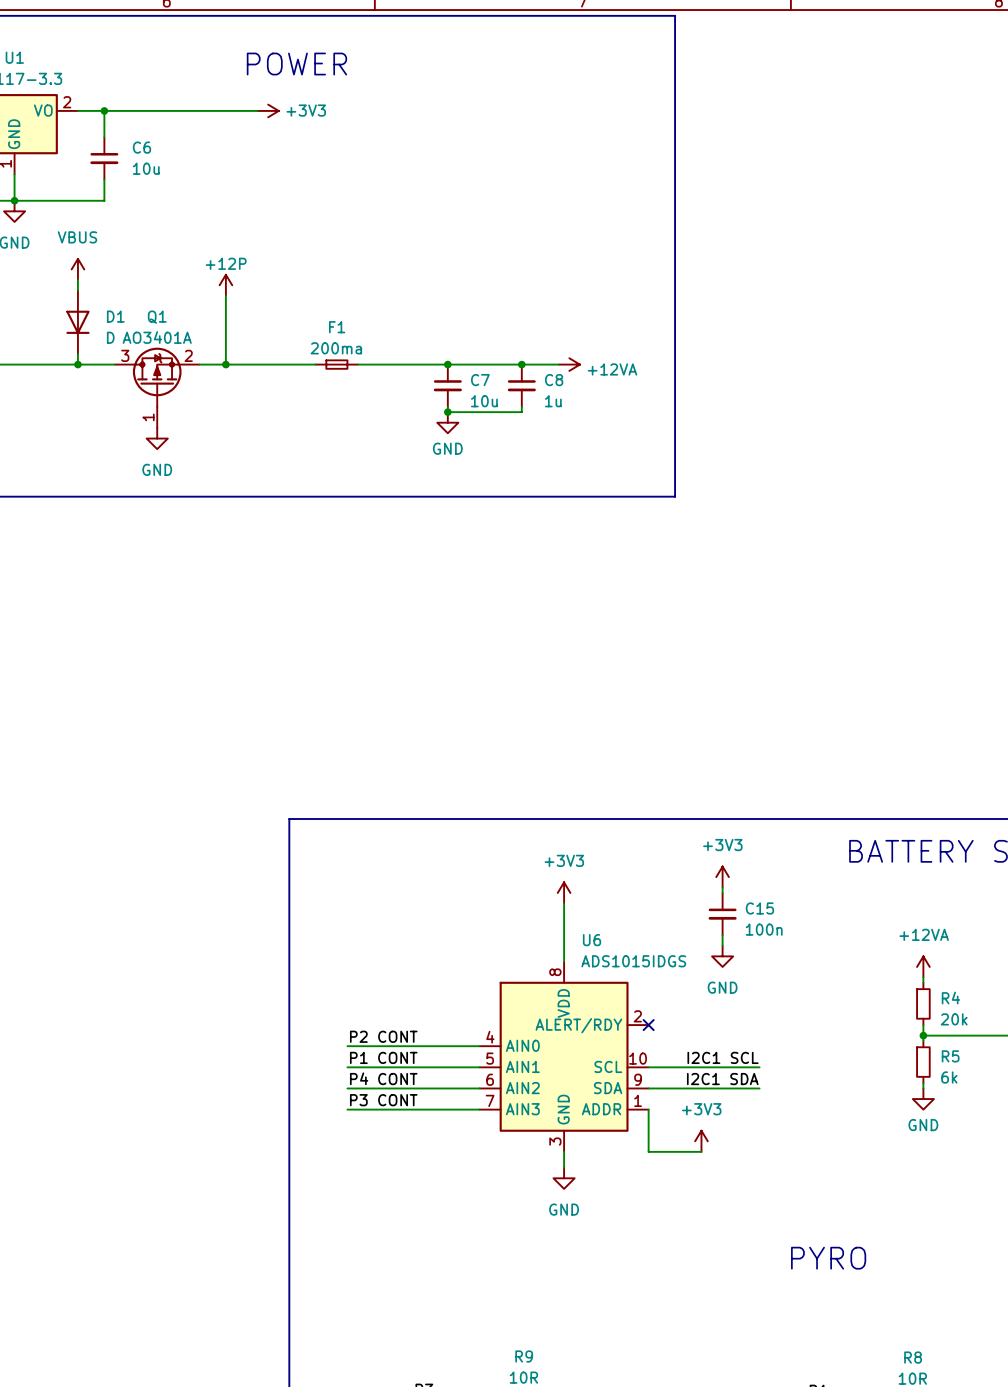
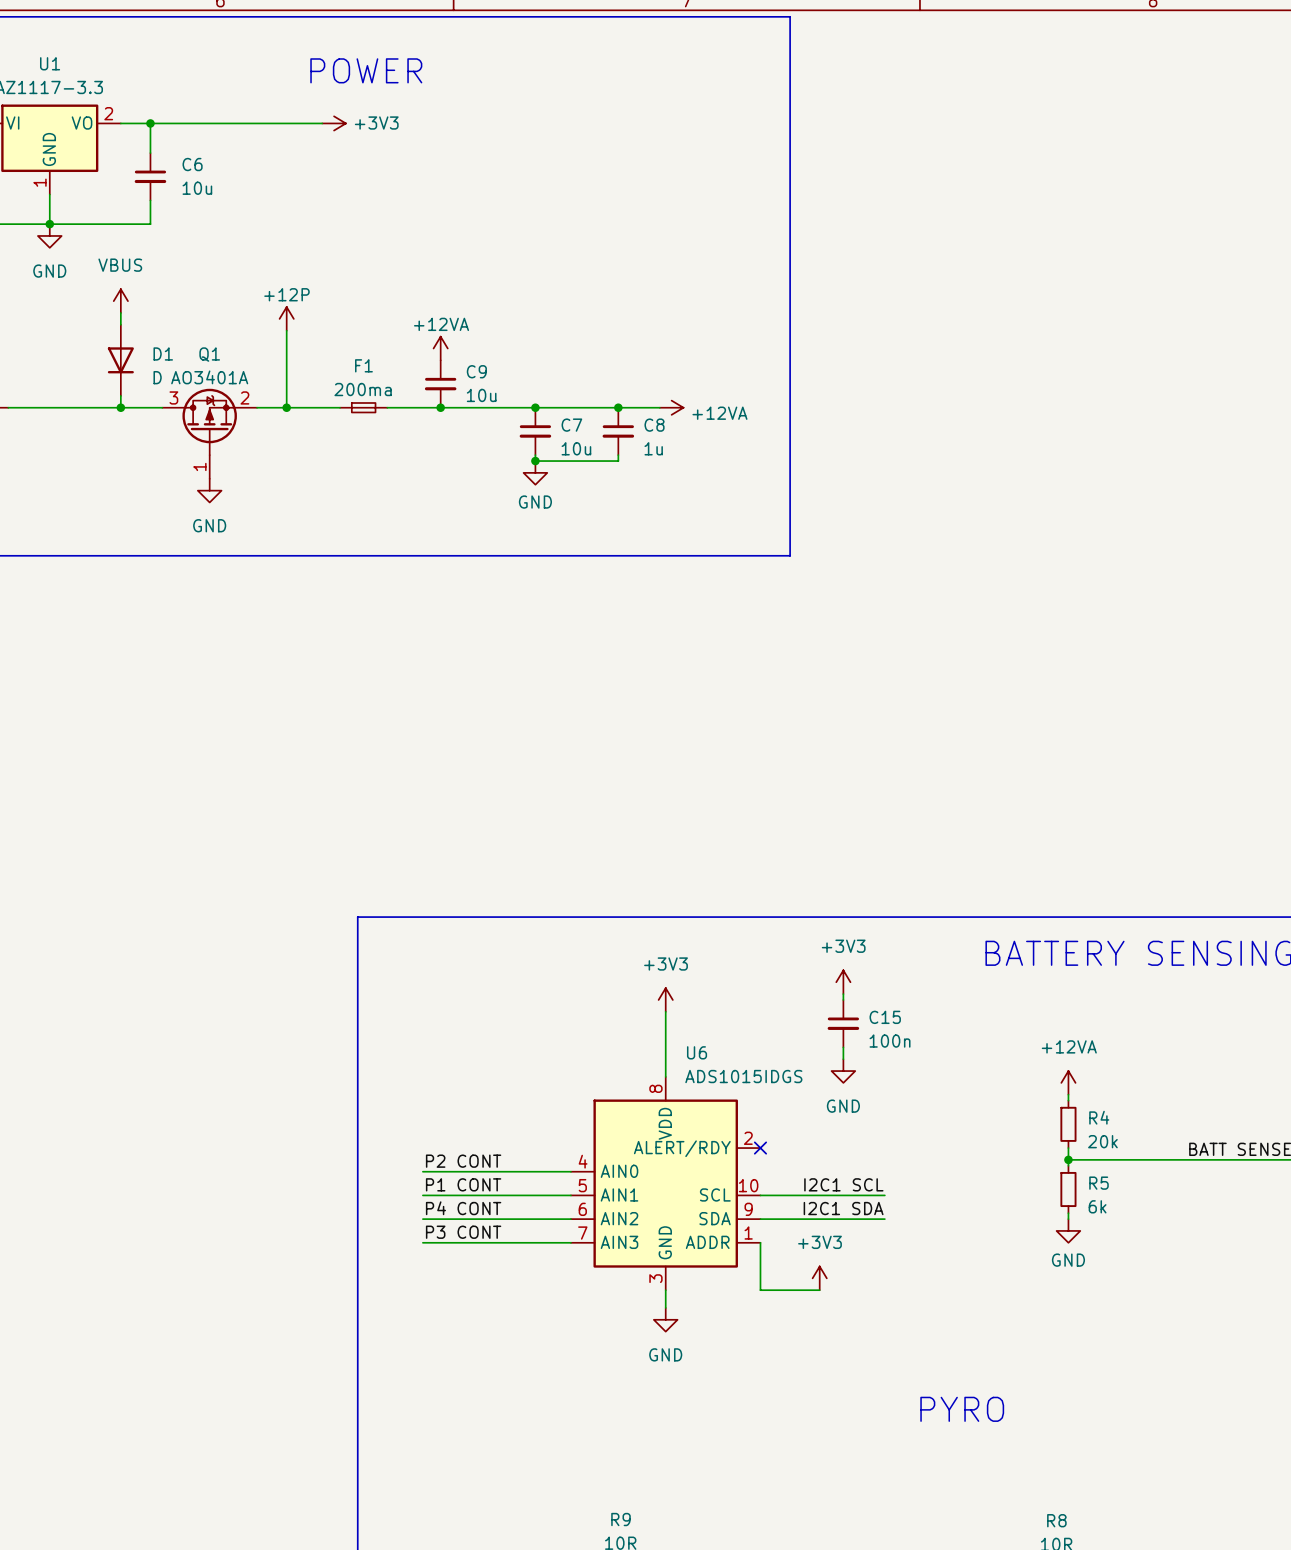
power symbol: none -> +12VA (440, 348)
C9: none -> 10u (440, 384)
F1 position: (336, 364) -> (363, 407)
junction: none -> (440, 407)

